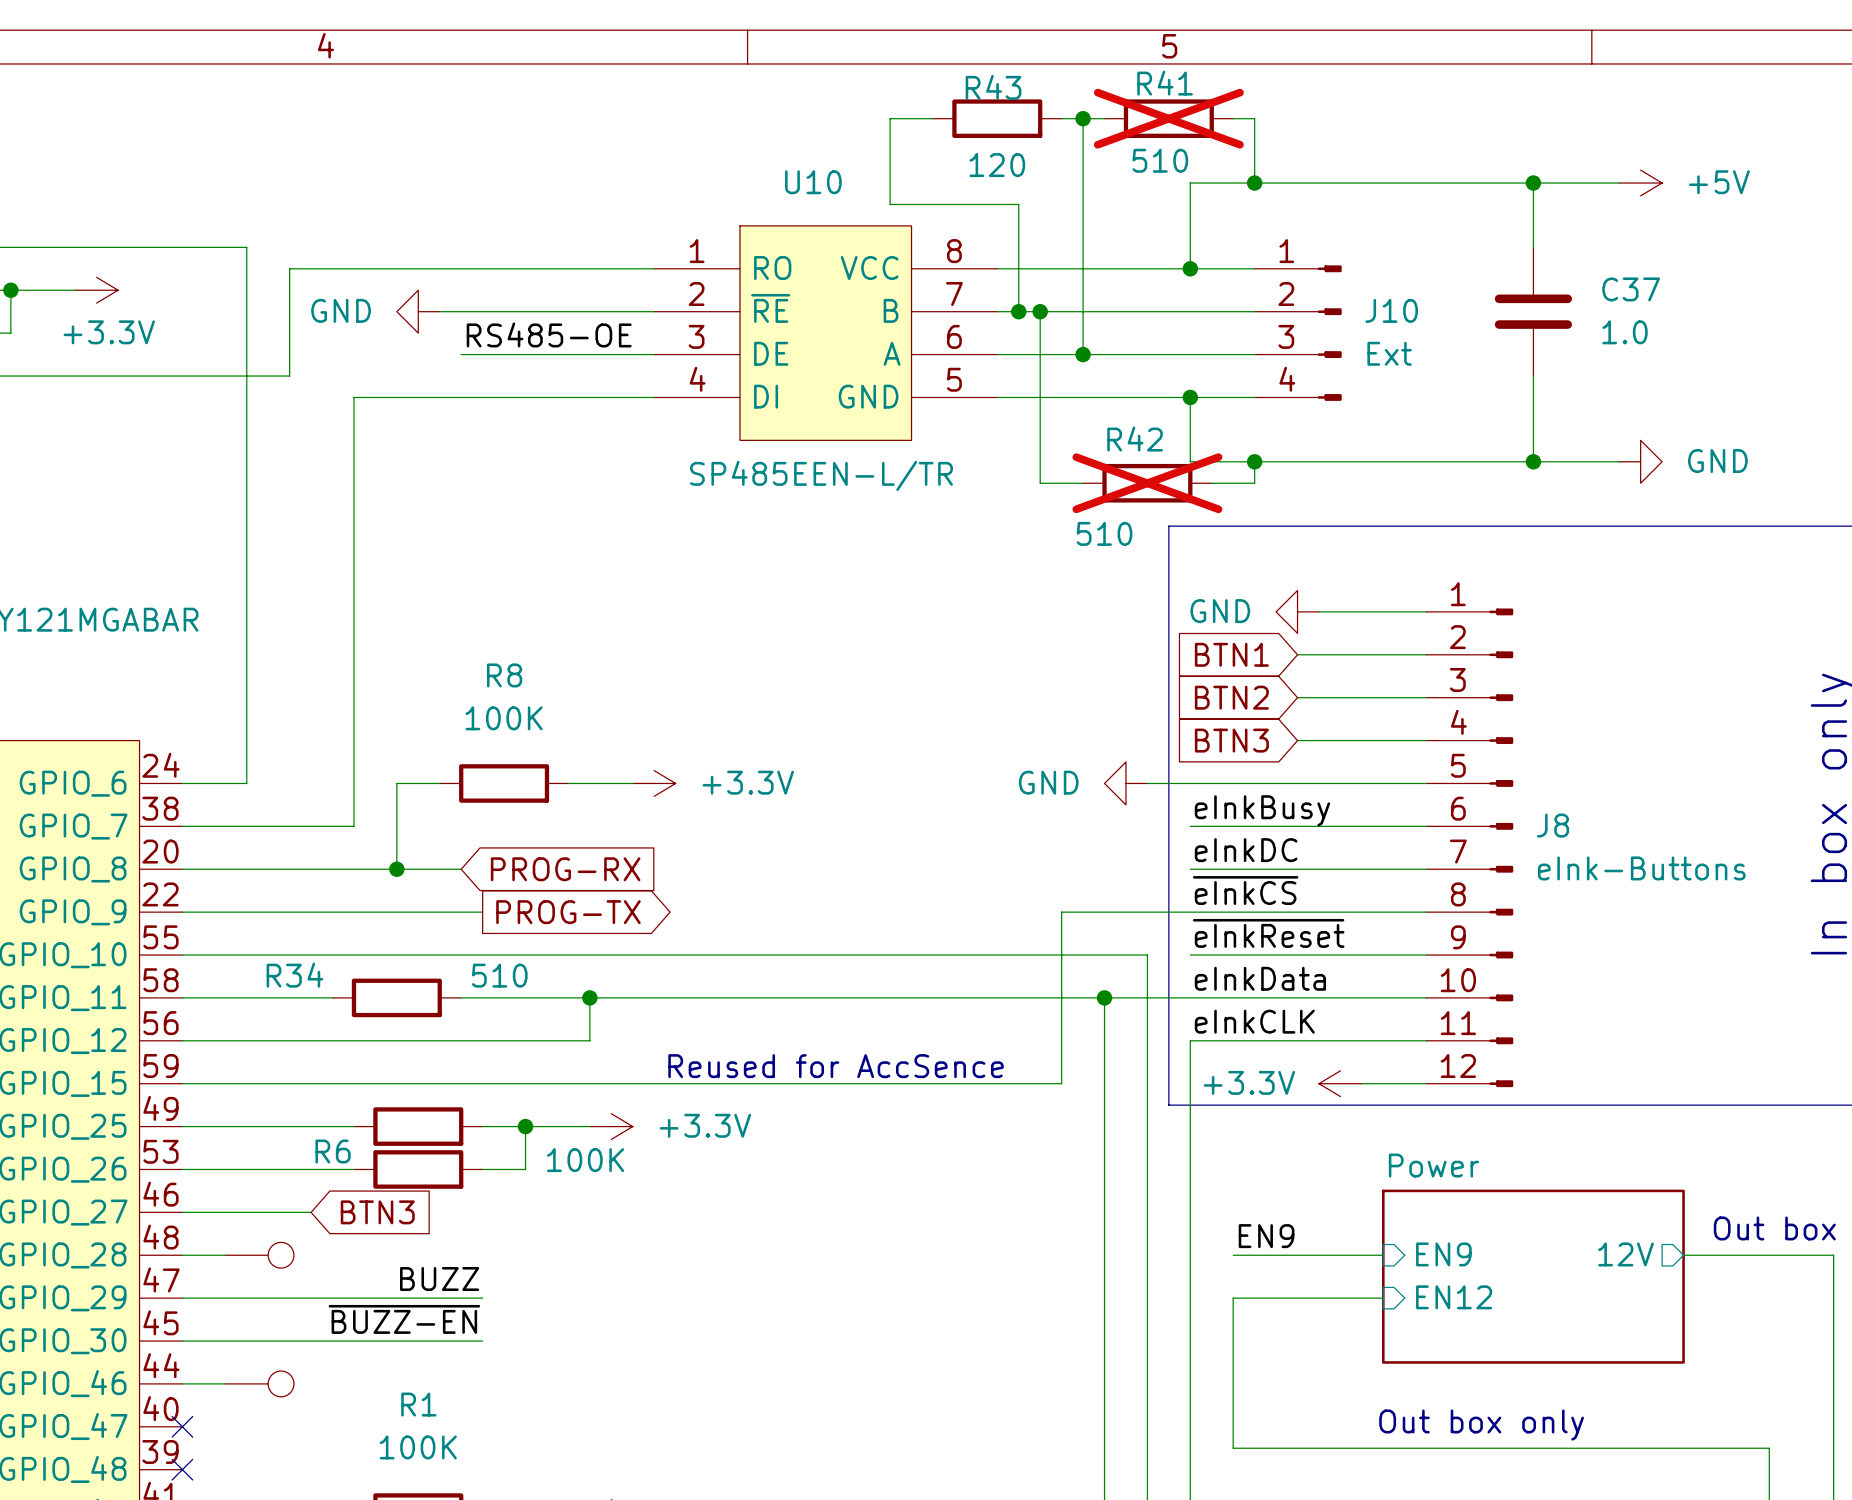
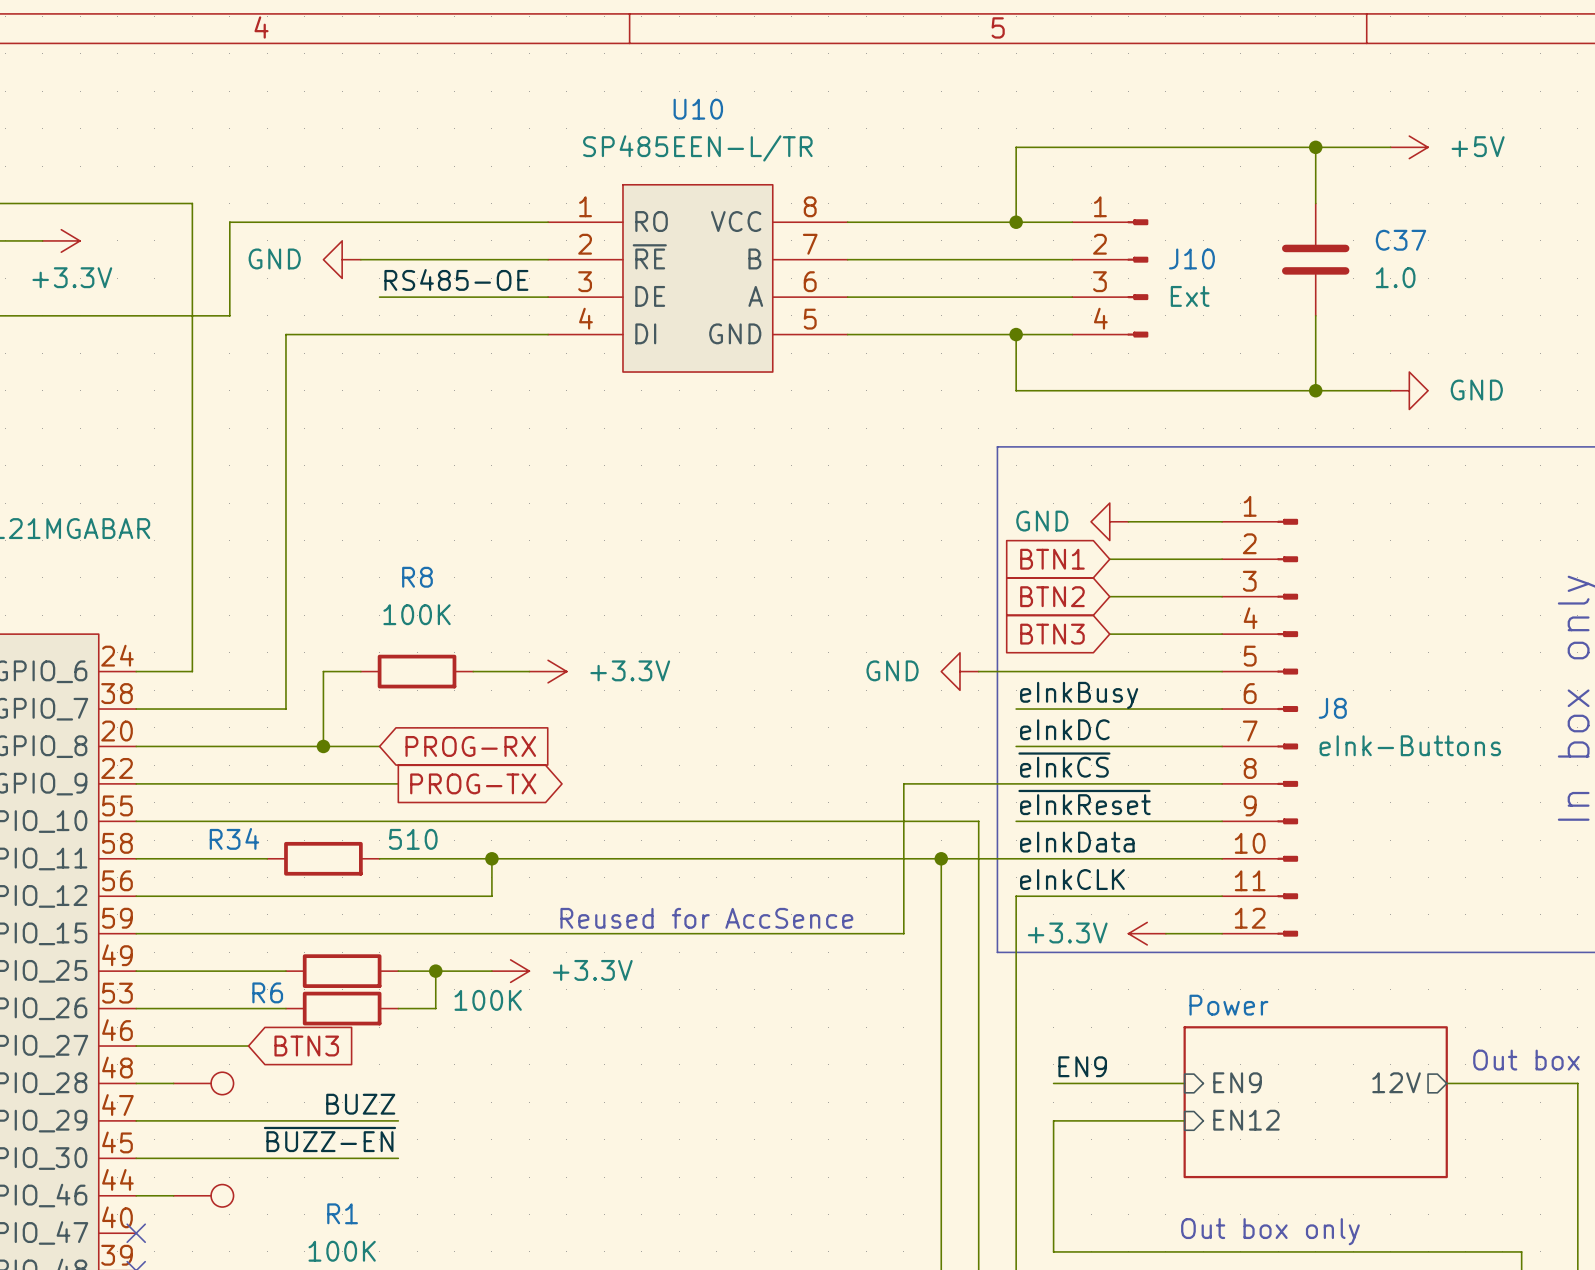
wire: (932, 118) (890, 118) (890, 204) (1018, 204) (1018, 311) -> none
R43: 120 (997, 118) -> none
wire: (1061, 118) (1104, 118) -> none
wire: (1083, 118) (1083, 354) -> none
junction: (1083, 118) -> none
R41: 510 (1168, 118) -> none
wire: (1233, 118) (1254, 118) (1254, 183) -> none
U10 name position: U10 (813, 182) -> U10 (698, 109)
junction: (1254, 183) -> none
junction: (1018, 311) -> none
wire: (1040, 311) (1040, 483) (1083, 483) -> none
junction: (1040, 311) -> none
junction: (1083, 354) -> none
wire: (1254, 461) (1254, 483) (1211, 483) -> none
junction: (1254, 461) -> none
U10 value position: SP485EEN-L/TR (821, 475) -> SP485EEN-L/TR (697, 148)
R42: 510 (1147, 483) -> none

